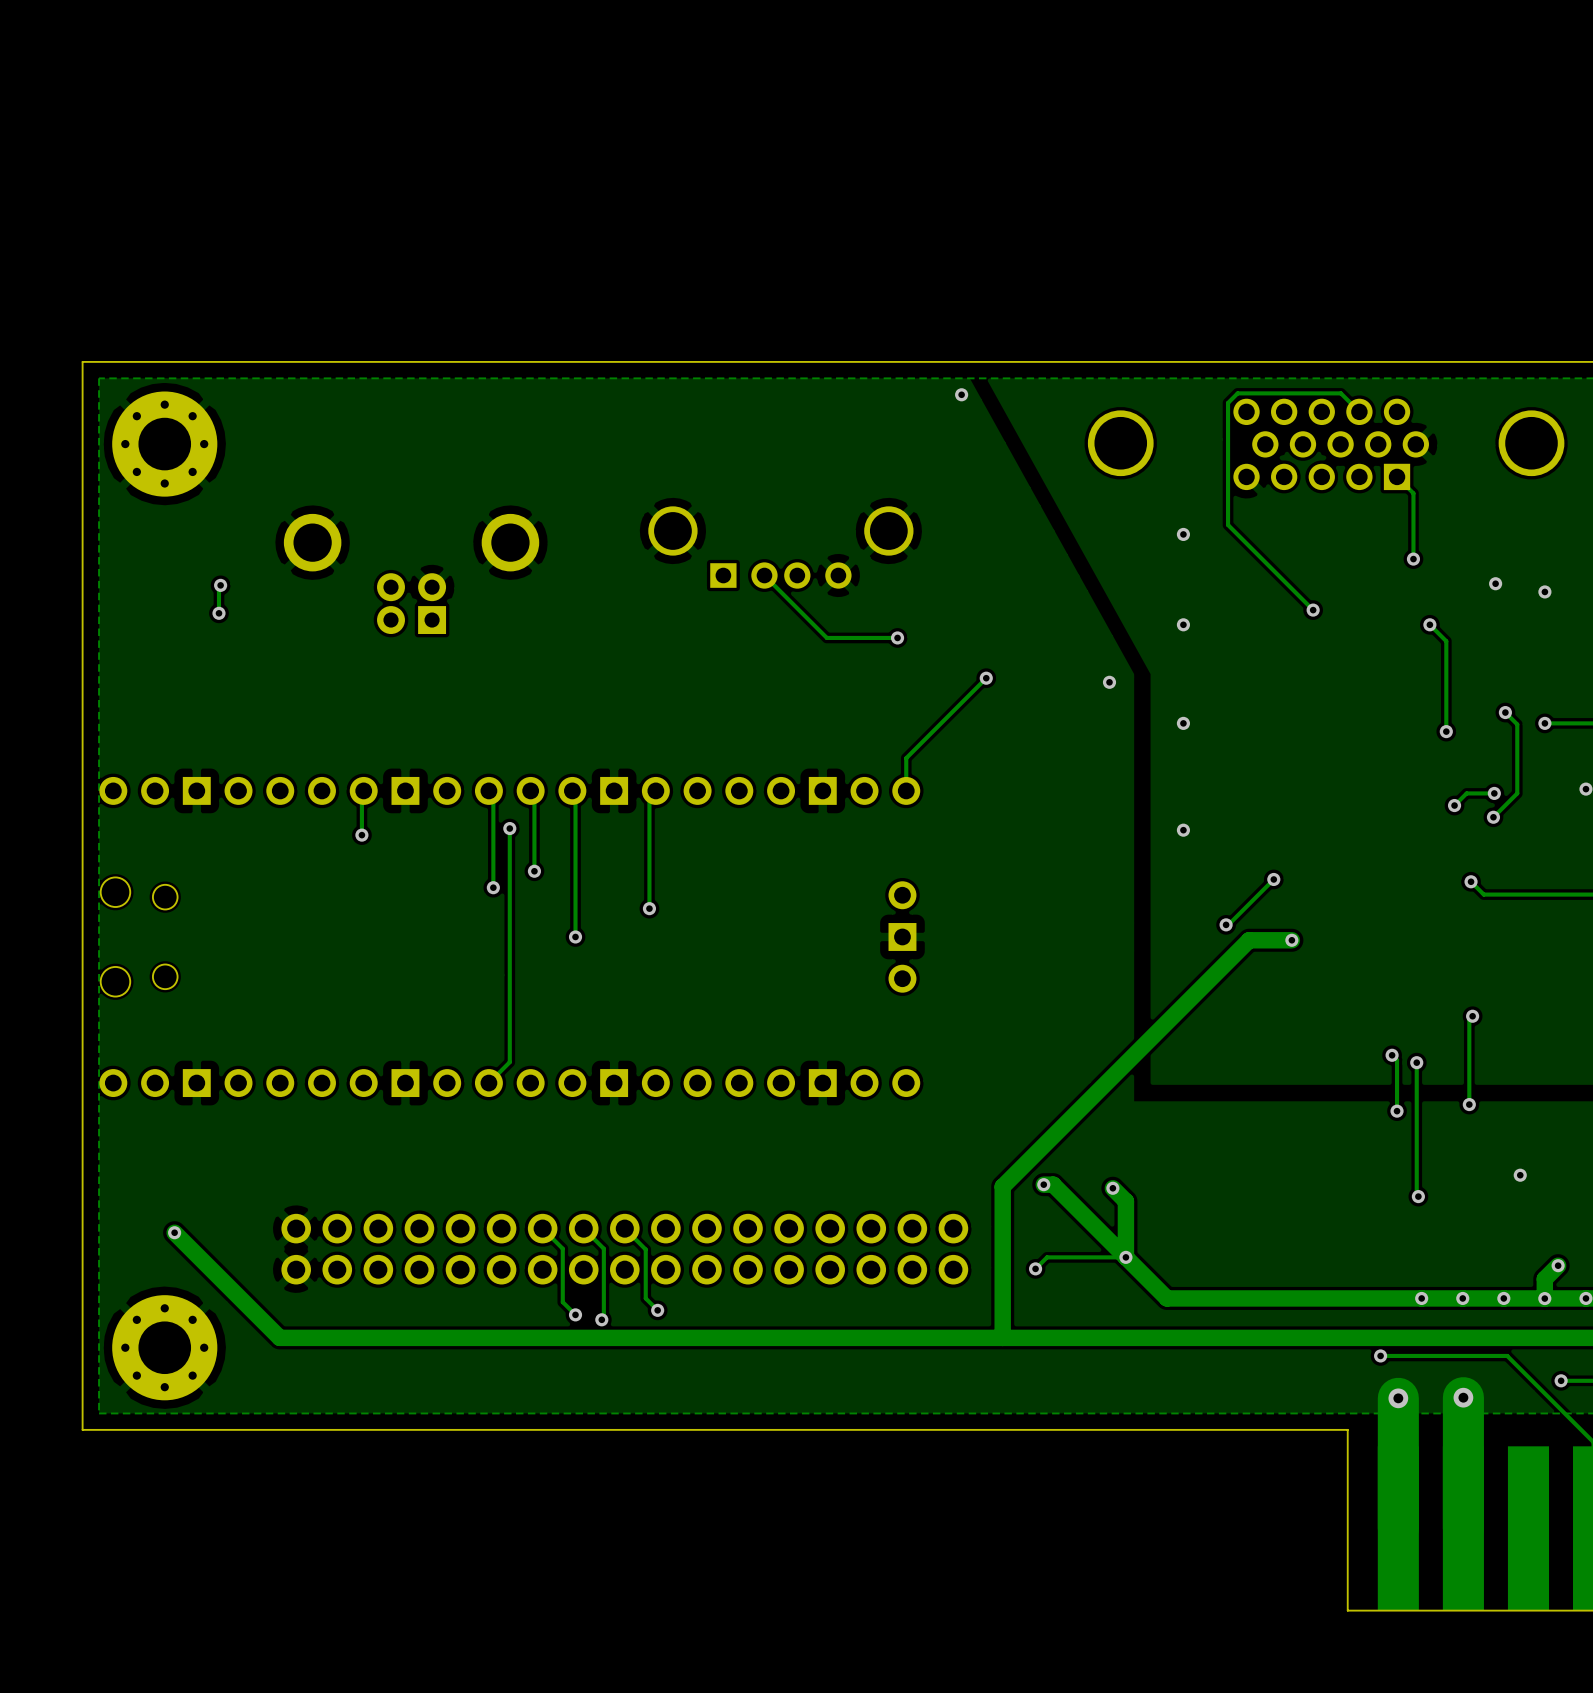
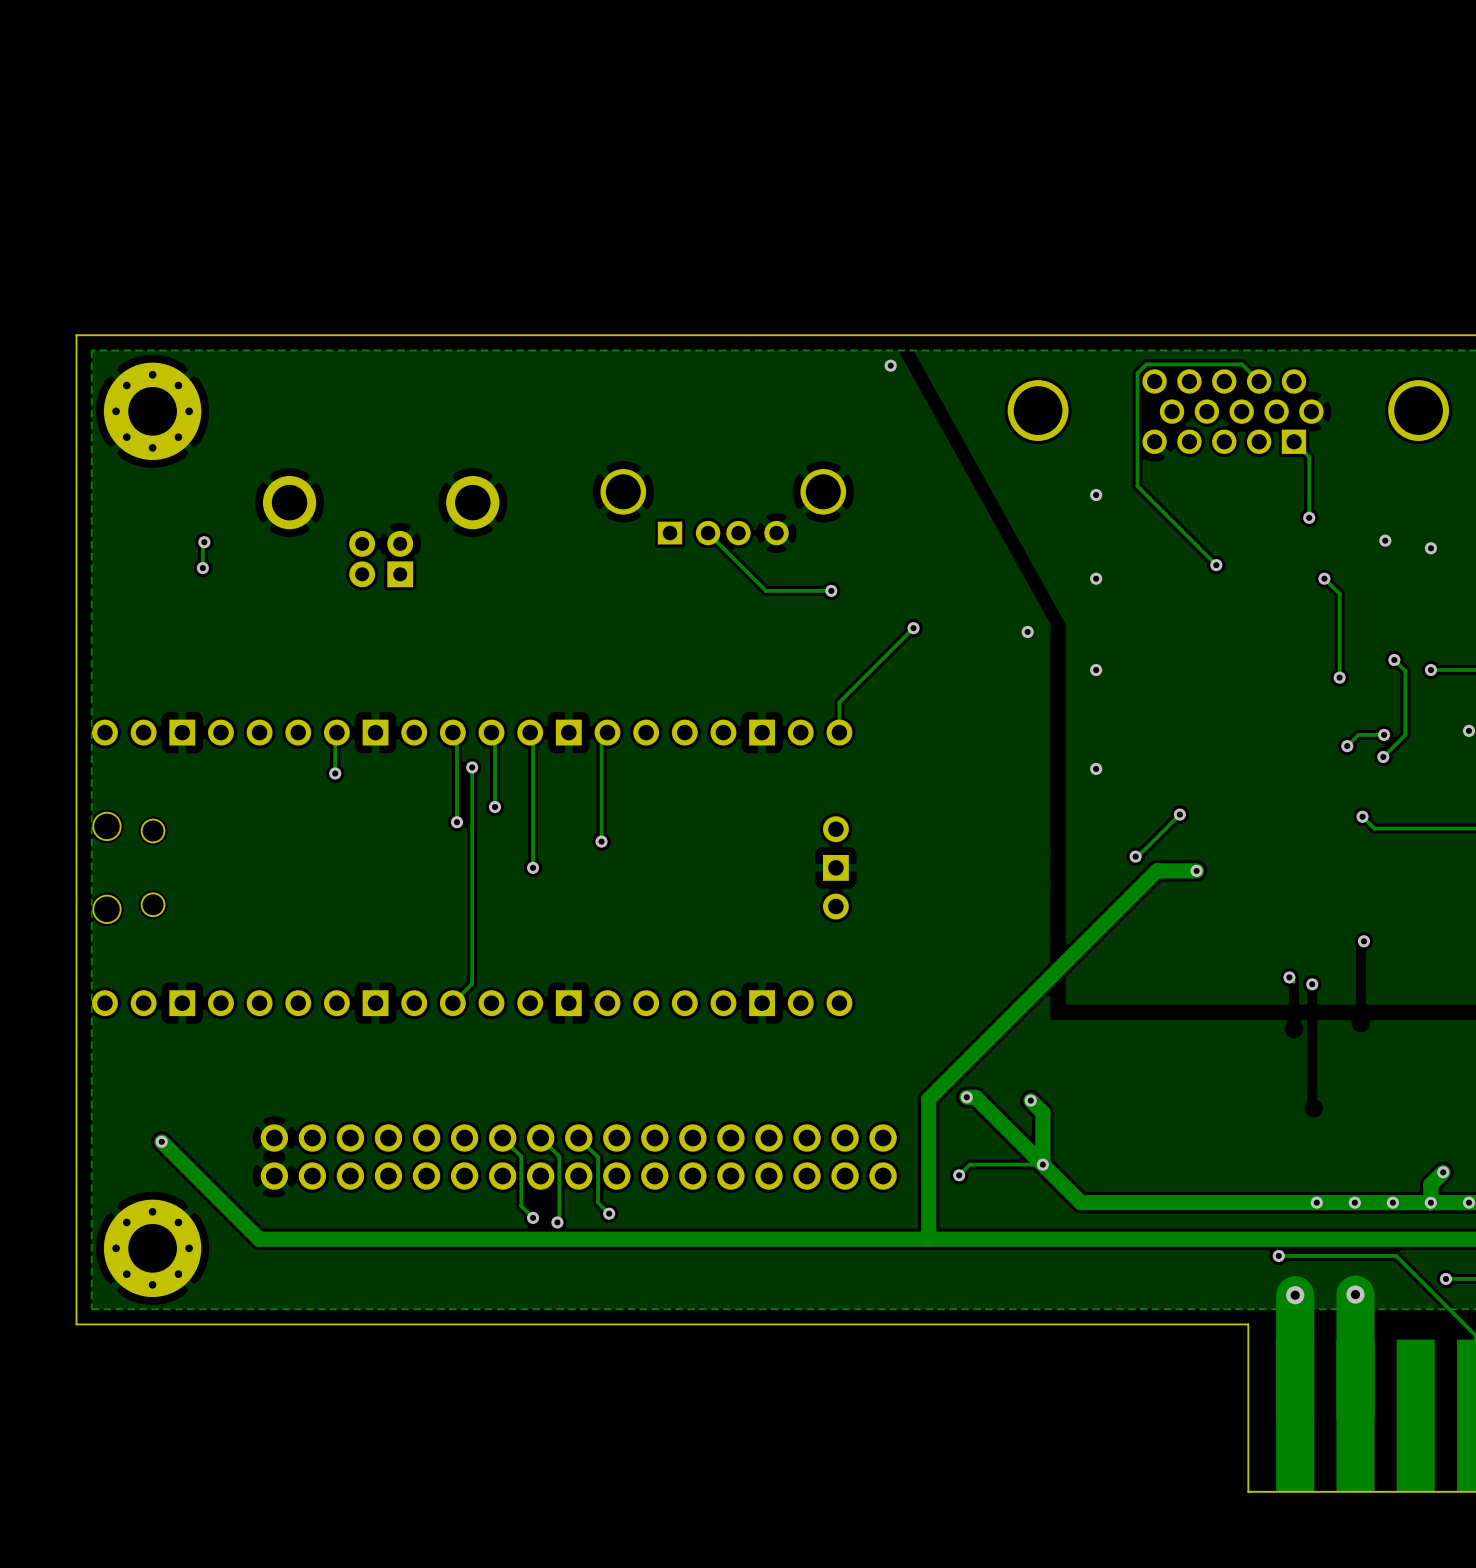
track: (1469, 1019) (1469, 1104) -> none
track: (1397, 1060) (1397, 1111) -> none
track: (1416, 1062) (1416, 1194) (1418, 1196) -> none
via: (1469, 1104) -> none
via: (1397, 1111) -> none
via: (1520, 1175) -> none
via: (1418, 1196) -> none

